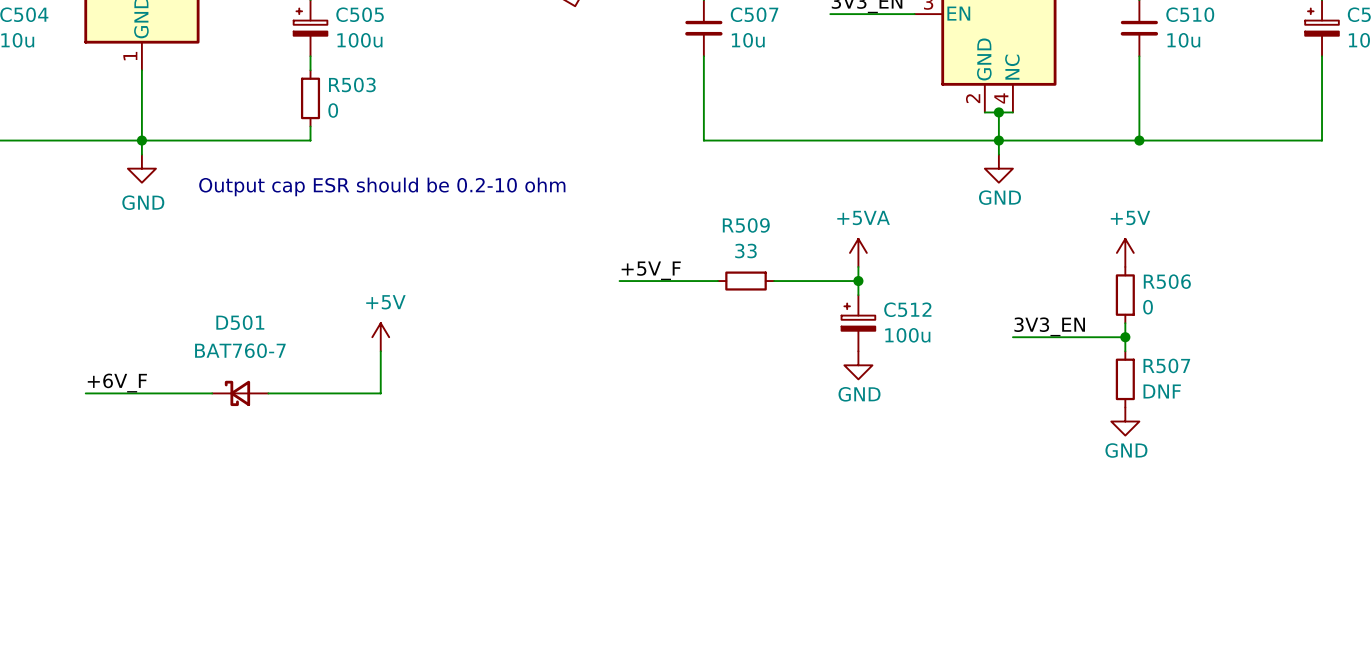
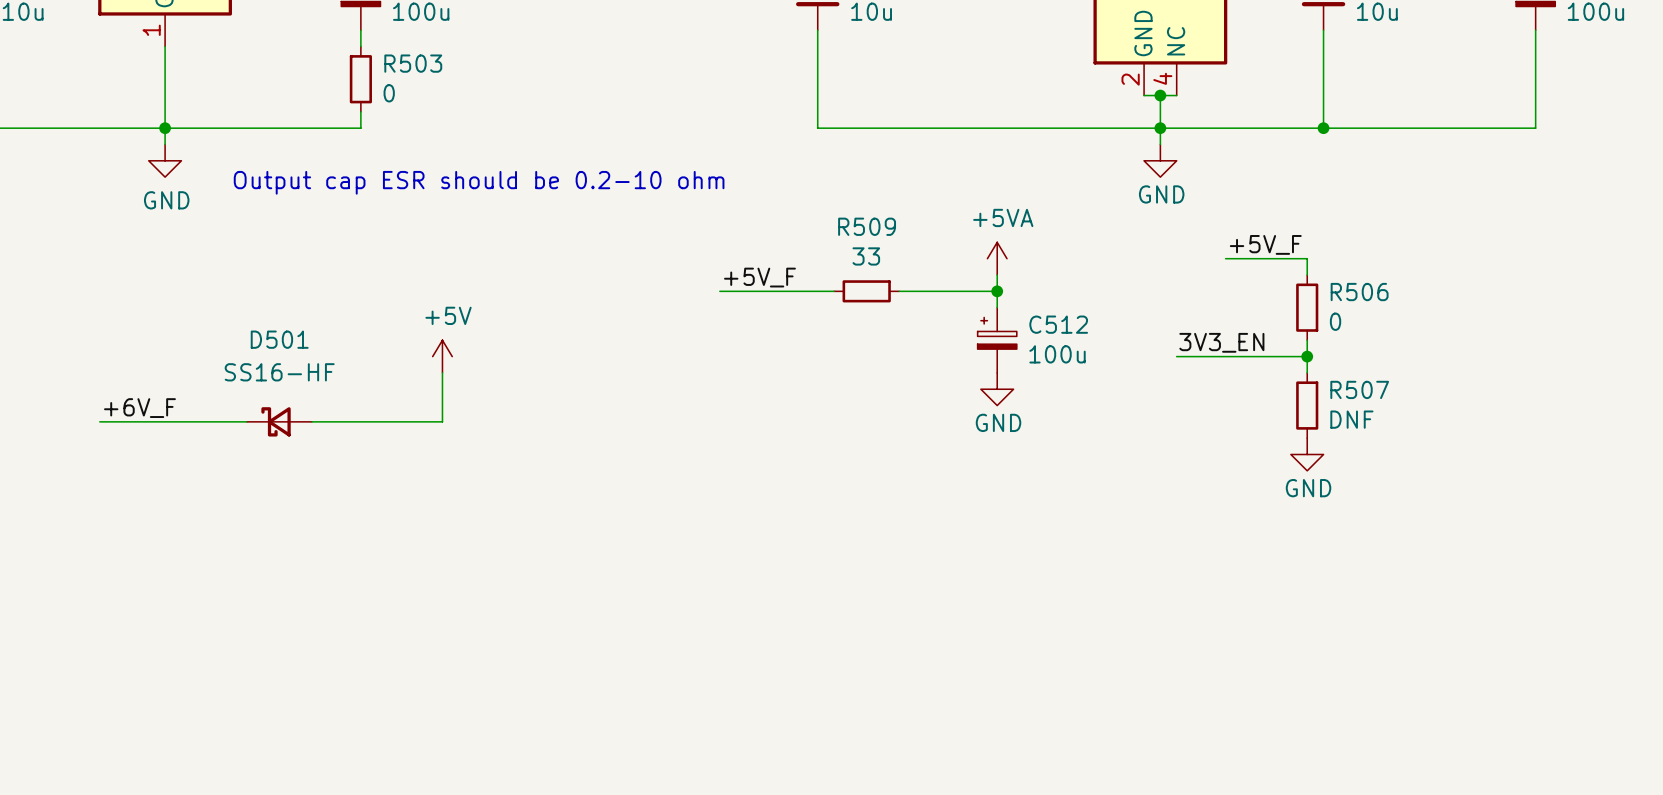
label: none -> +5V_F (1265, 244)
wire: none -> (1225, 258) (1307, 258) (1307, 275)
power symbol: +5V (1125, 252) -> none
D501 value: BAT760-7 (240, 350) -> SS16-HF (279, 372)

